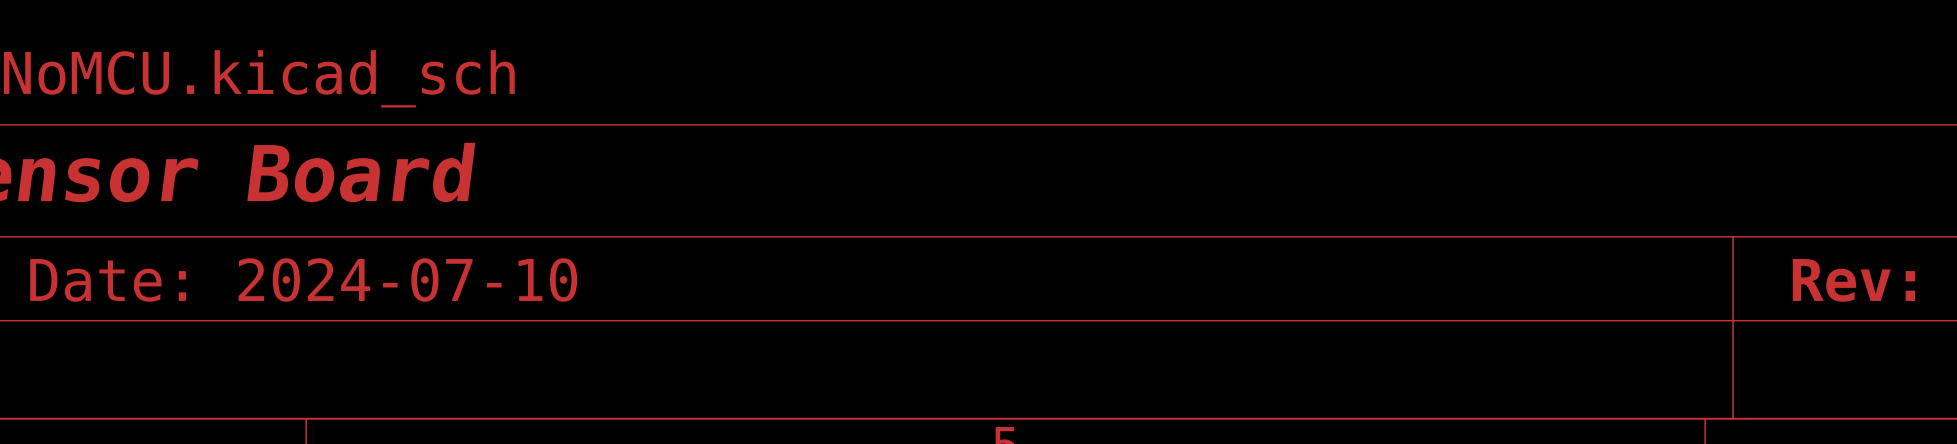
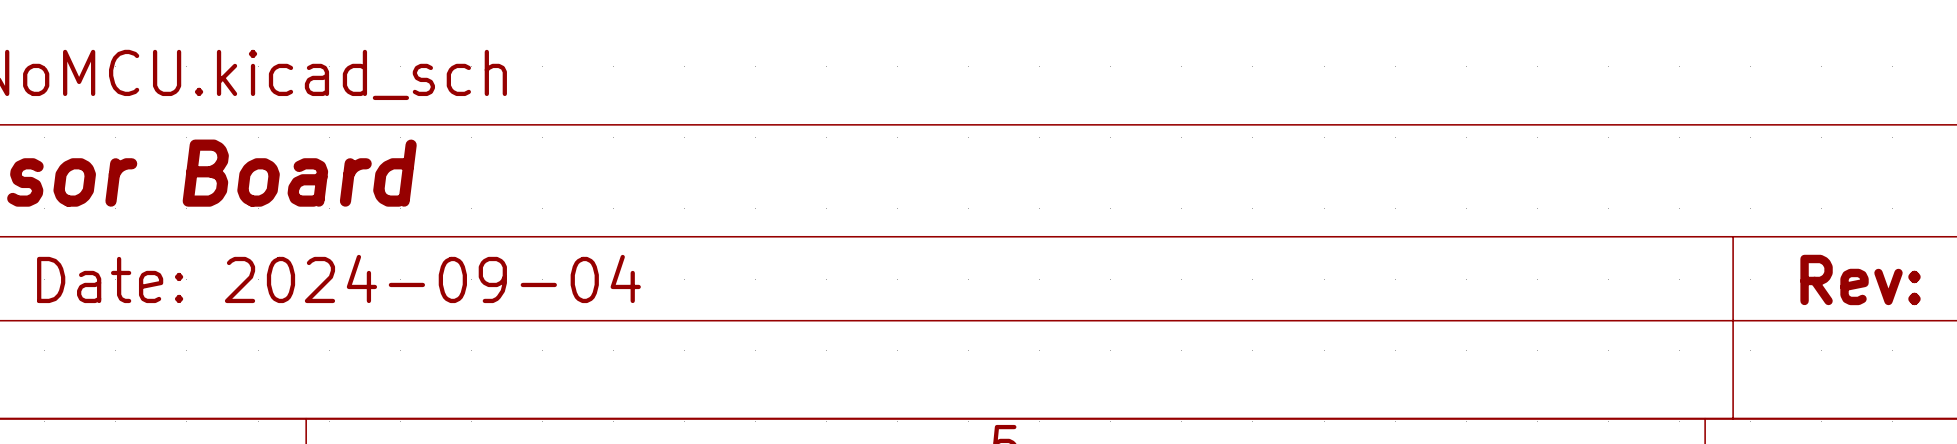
title block: Date: 2024-07-10 (303, 280) -> Date: 2024-09-04 (338, 278)

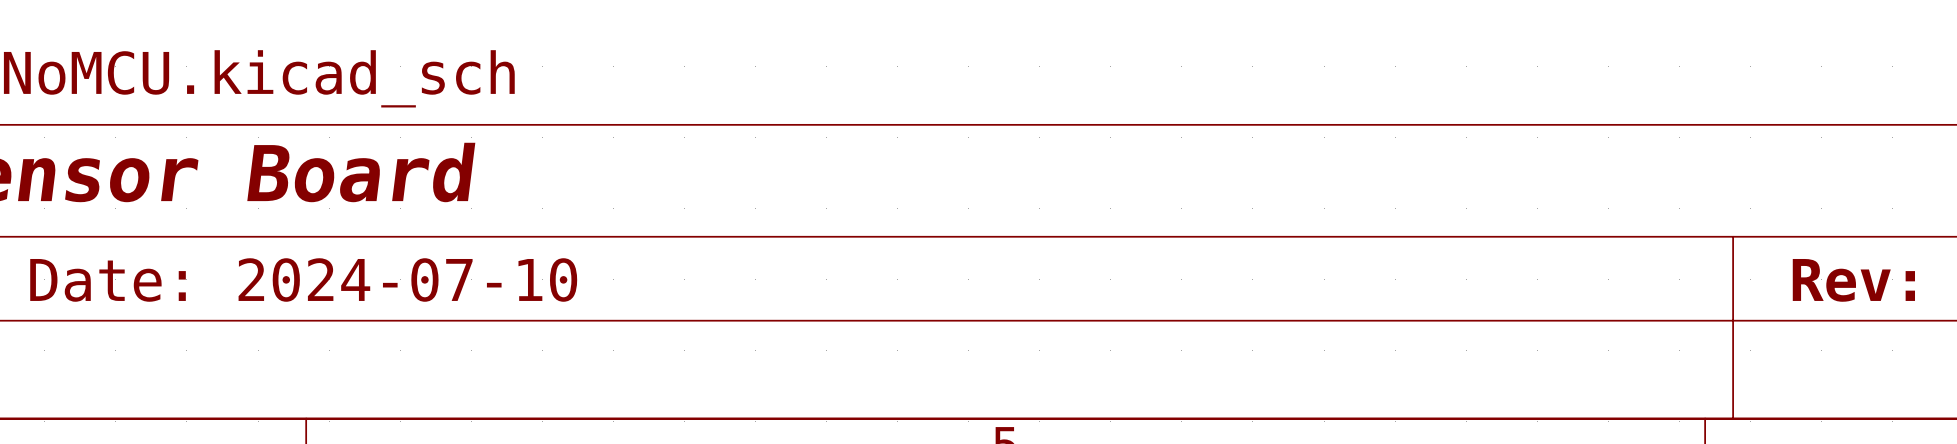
title block: Date: 2024-09-04 (338, 278) -> Date: 2024-07-10 (303, 280)

